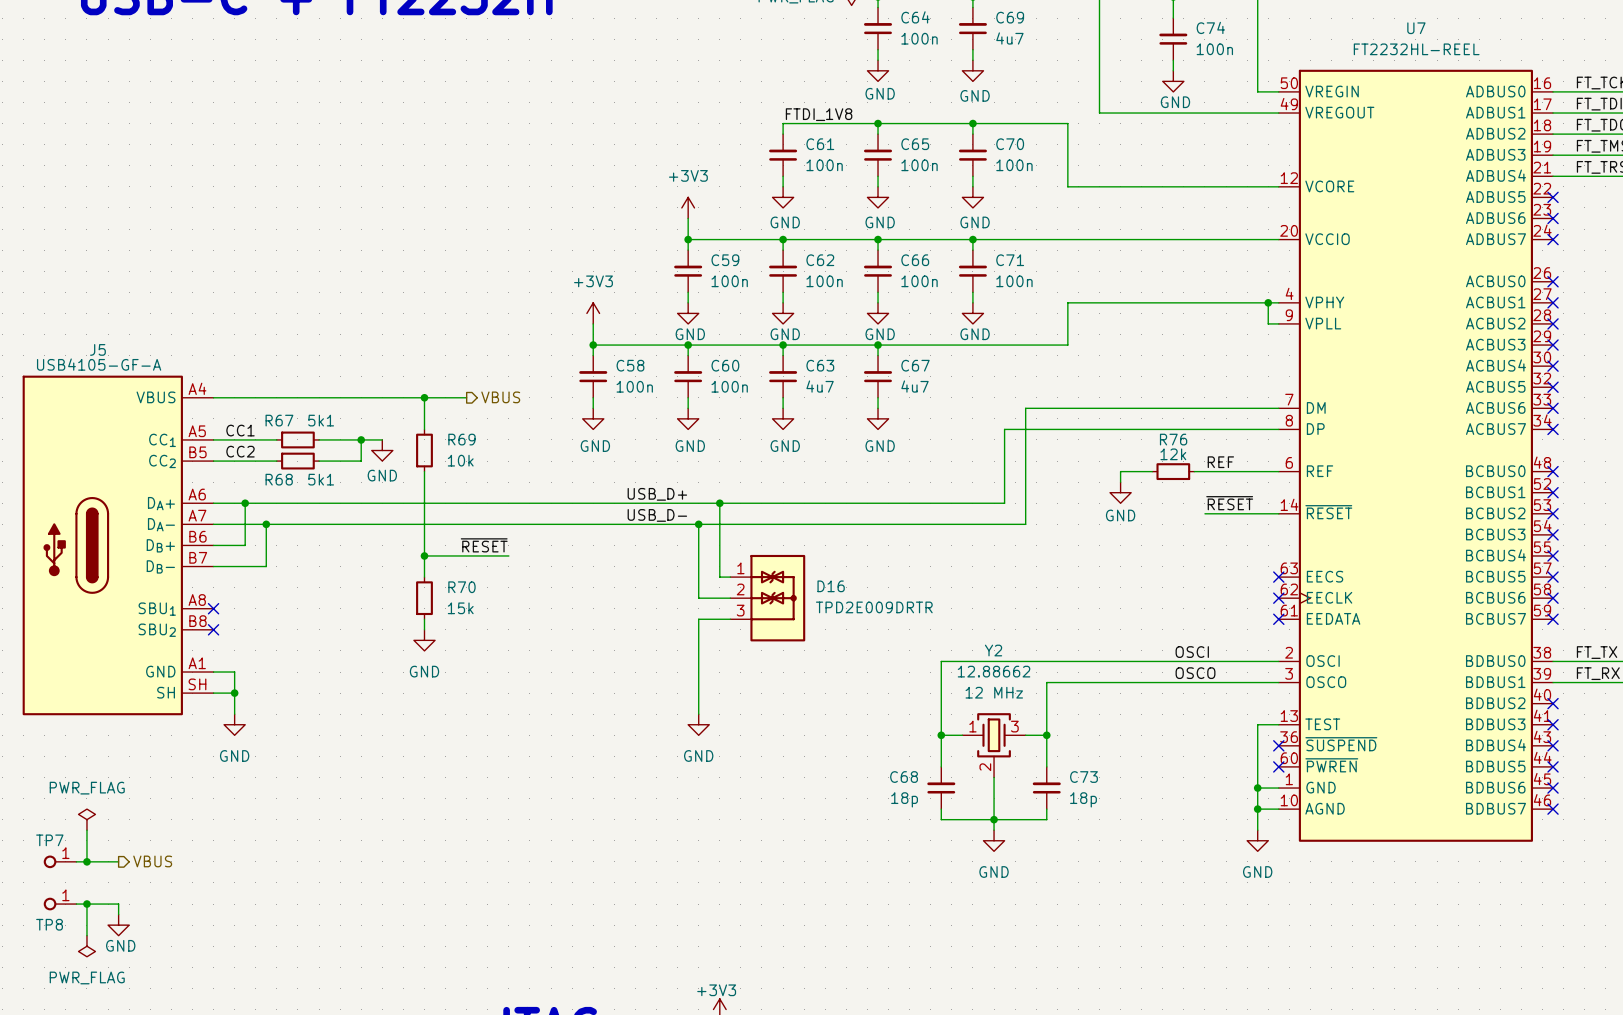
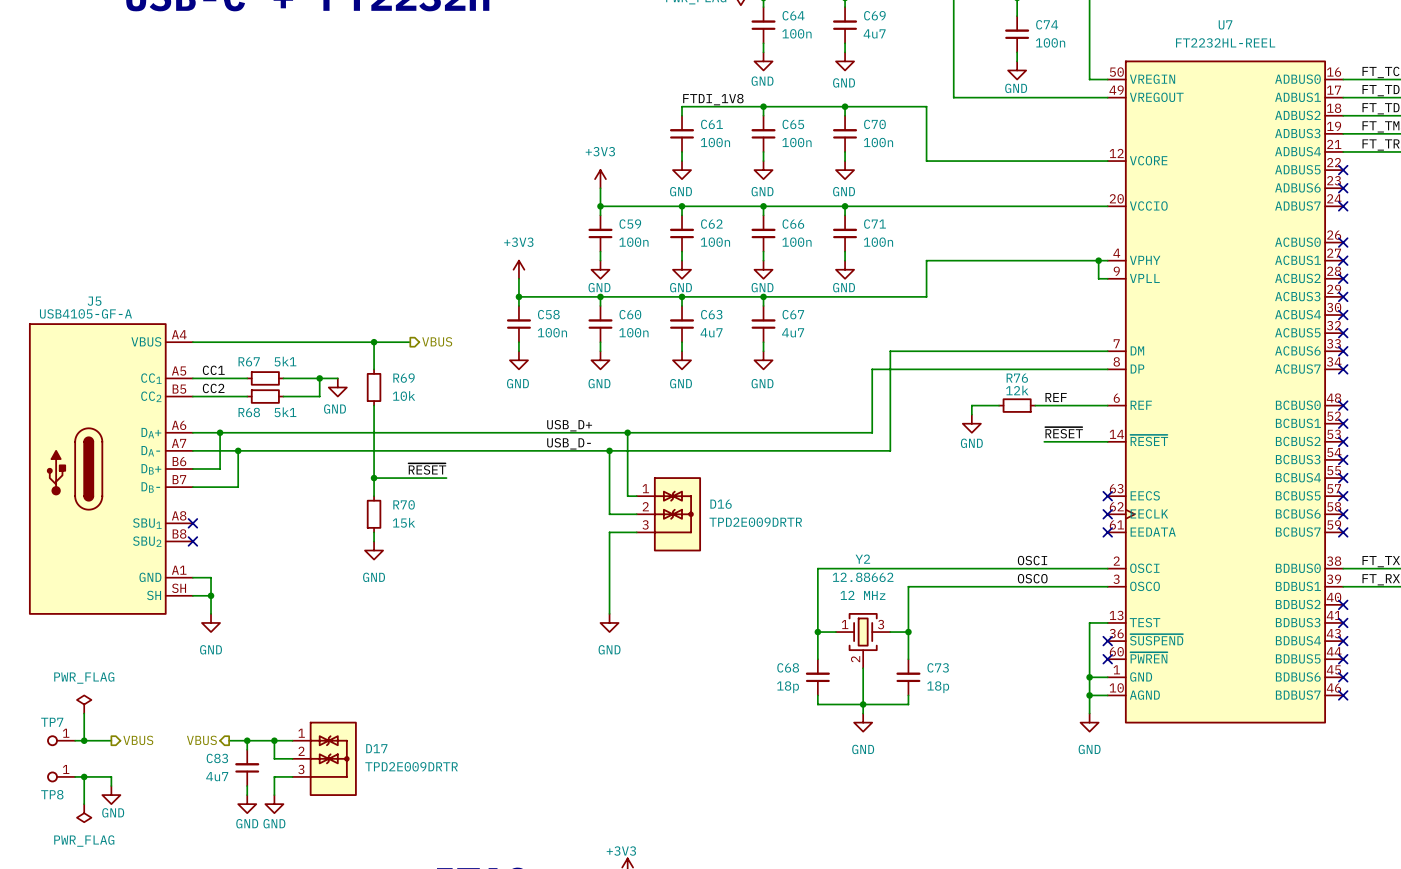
hierarchical label: none -> VBUS (201, 740)
wire: none -> (229, 740) (292, 740)
wire: none -> (247, 740) (247, 749)
junction: none -> (247, 740)
wire: none -> (274, 740) (274, 758) (292, 758)
junction: none -> (274, 740)
D17: none -> (324, 758)
C83: none -> (247, 767)
wire: none -> (292, 776) (274, 776) (274, 795)
wire: none -> (247, 786) (247, 795)
power symbol: none -> GND (247, 804)
power symbol: none -> GND (274, 804)

